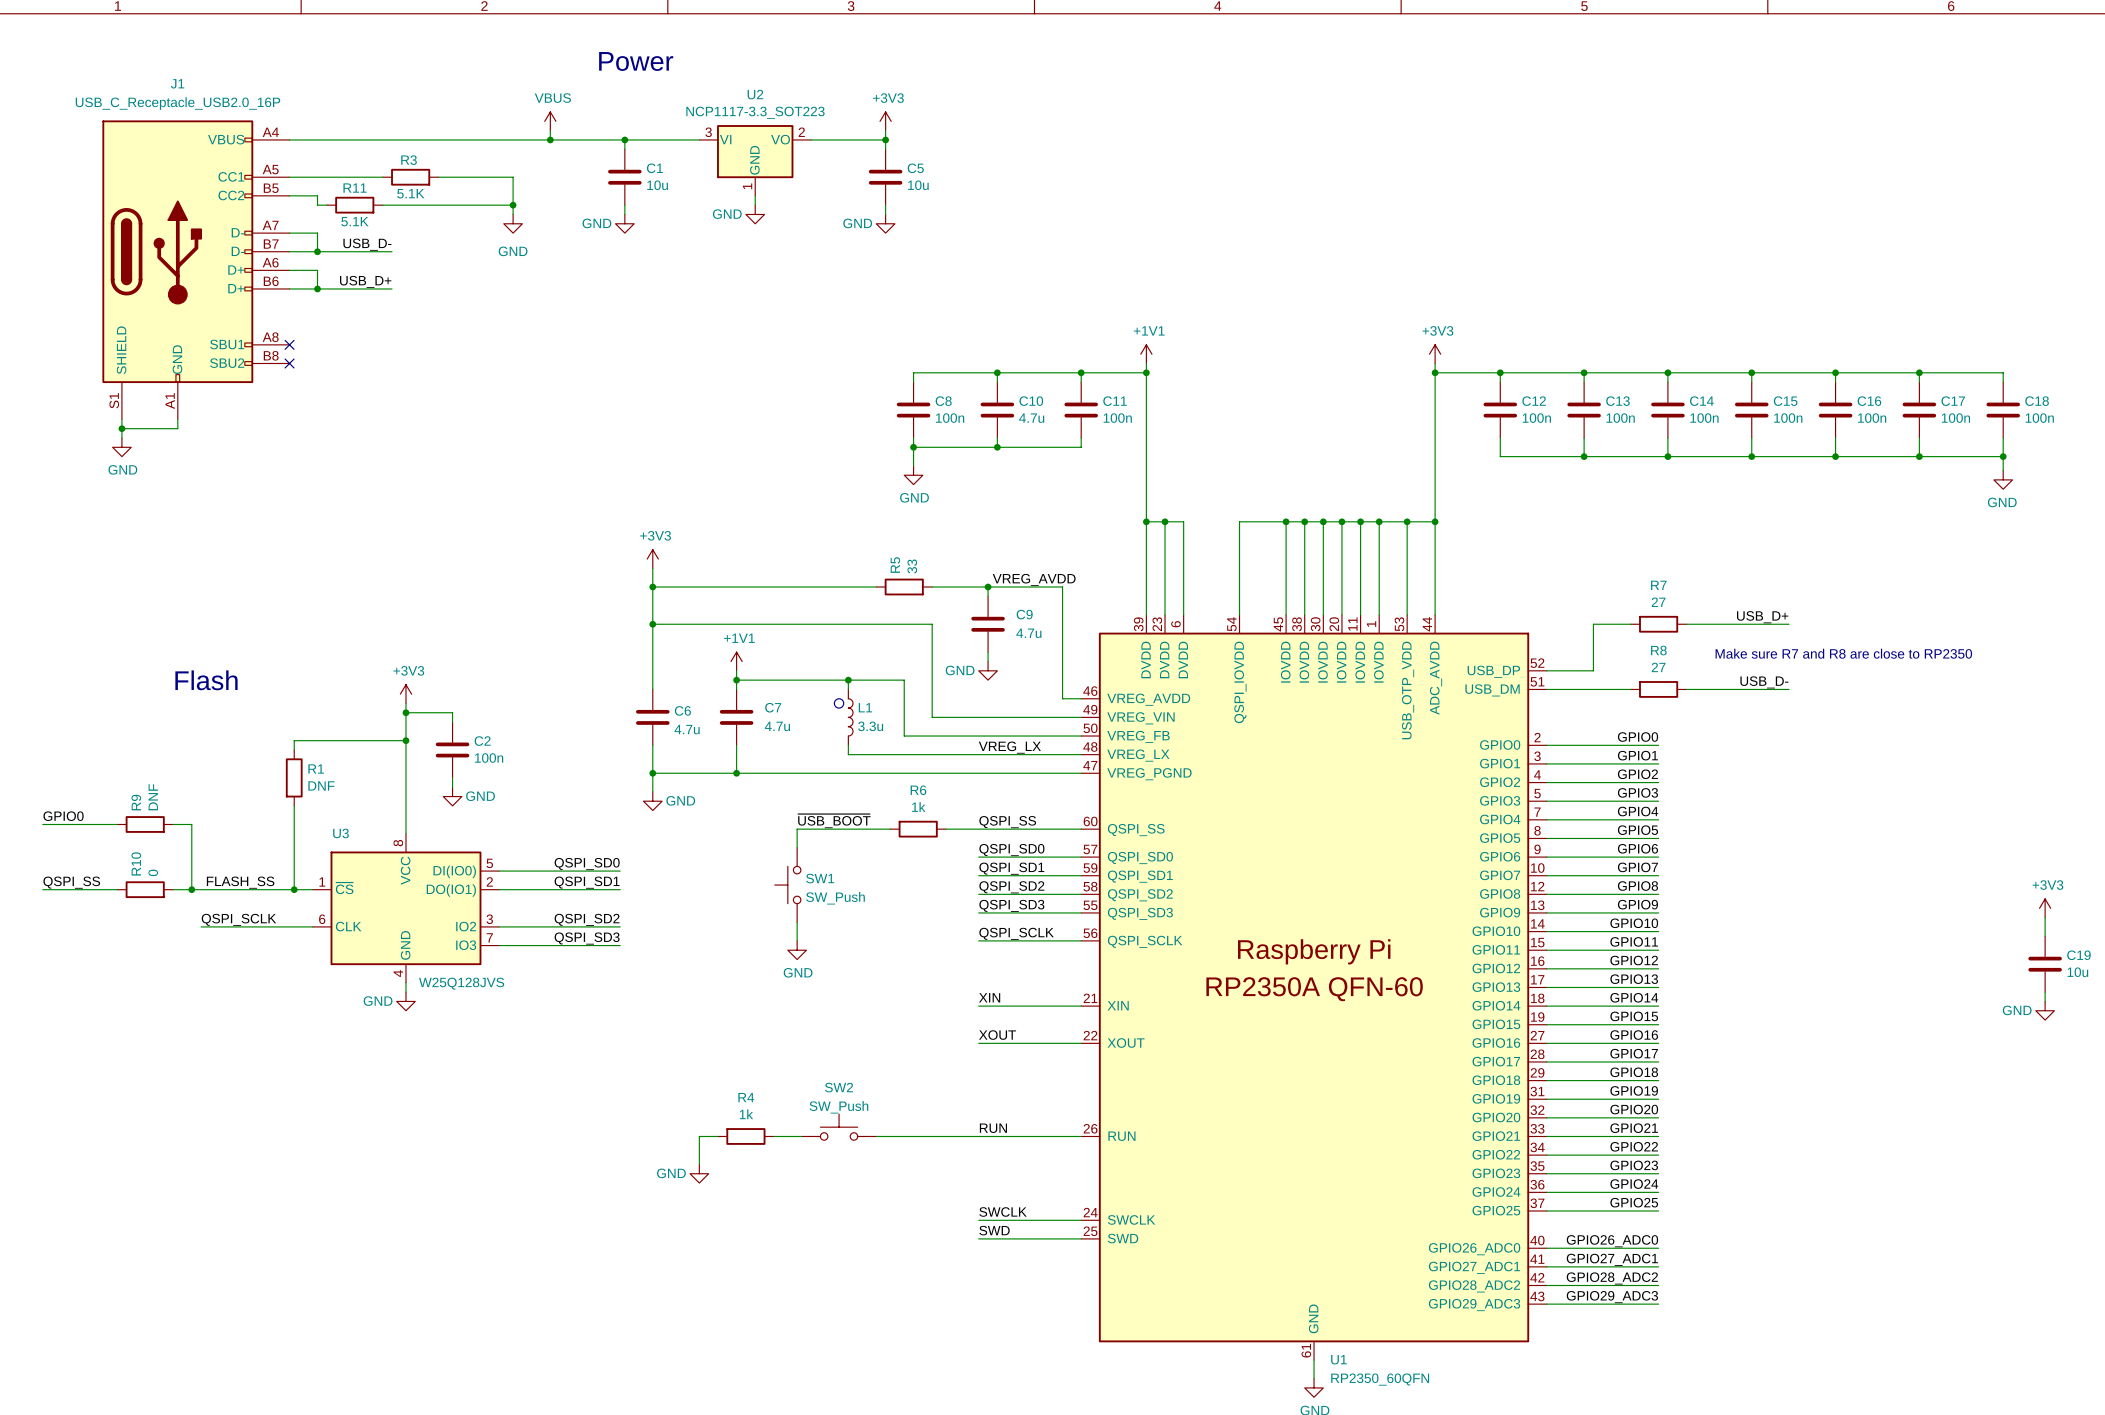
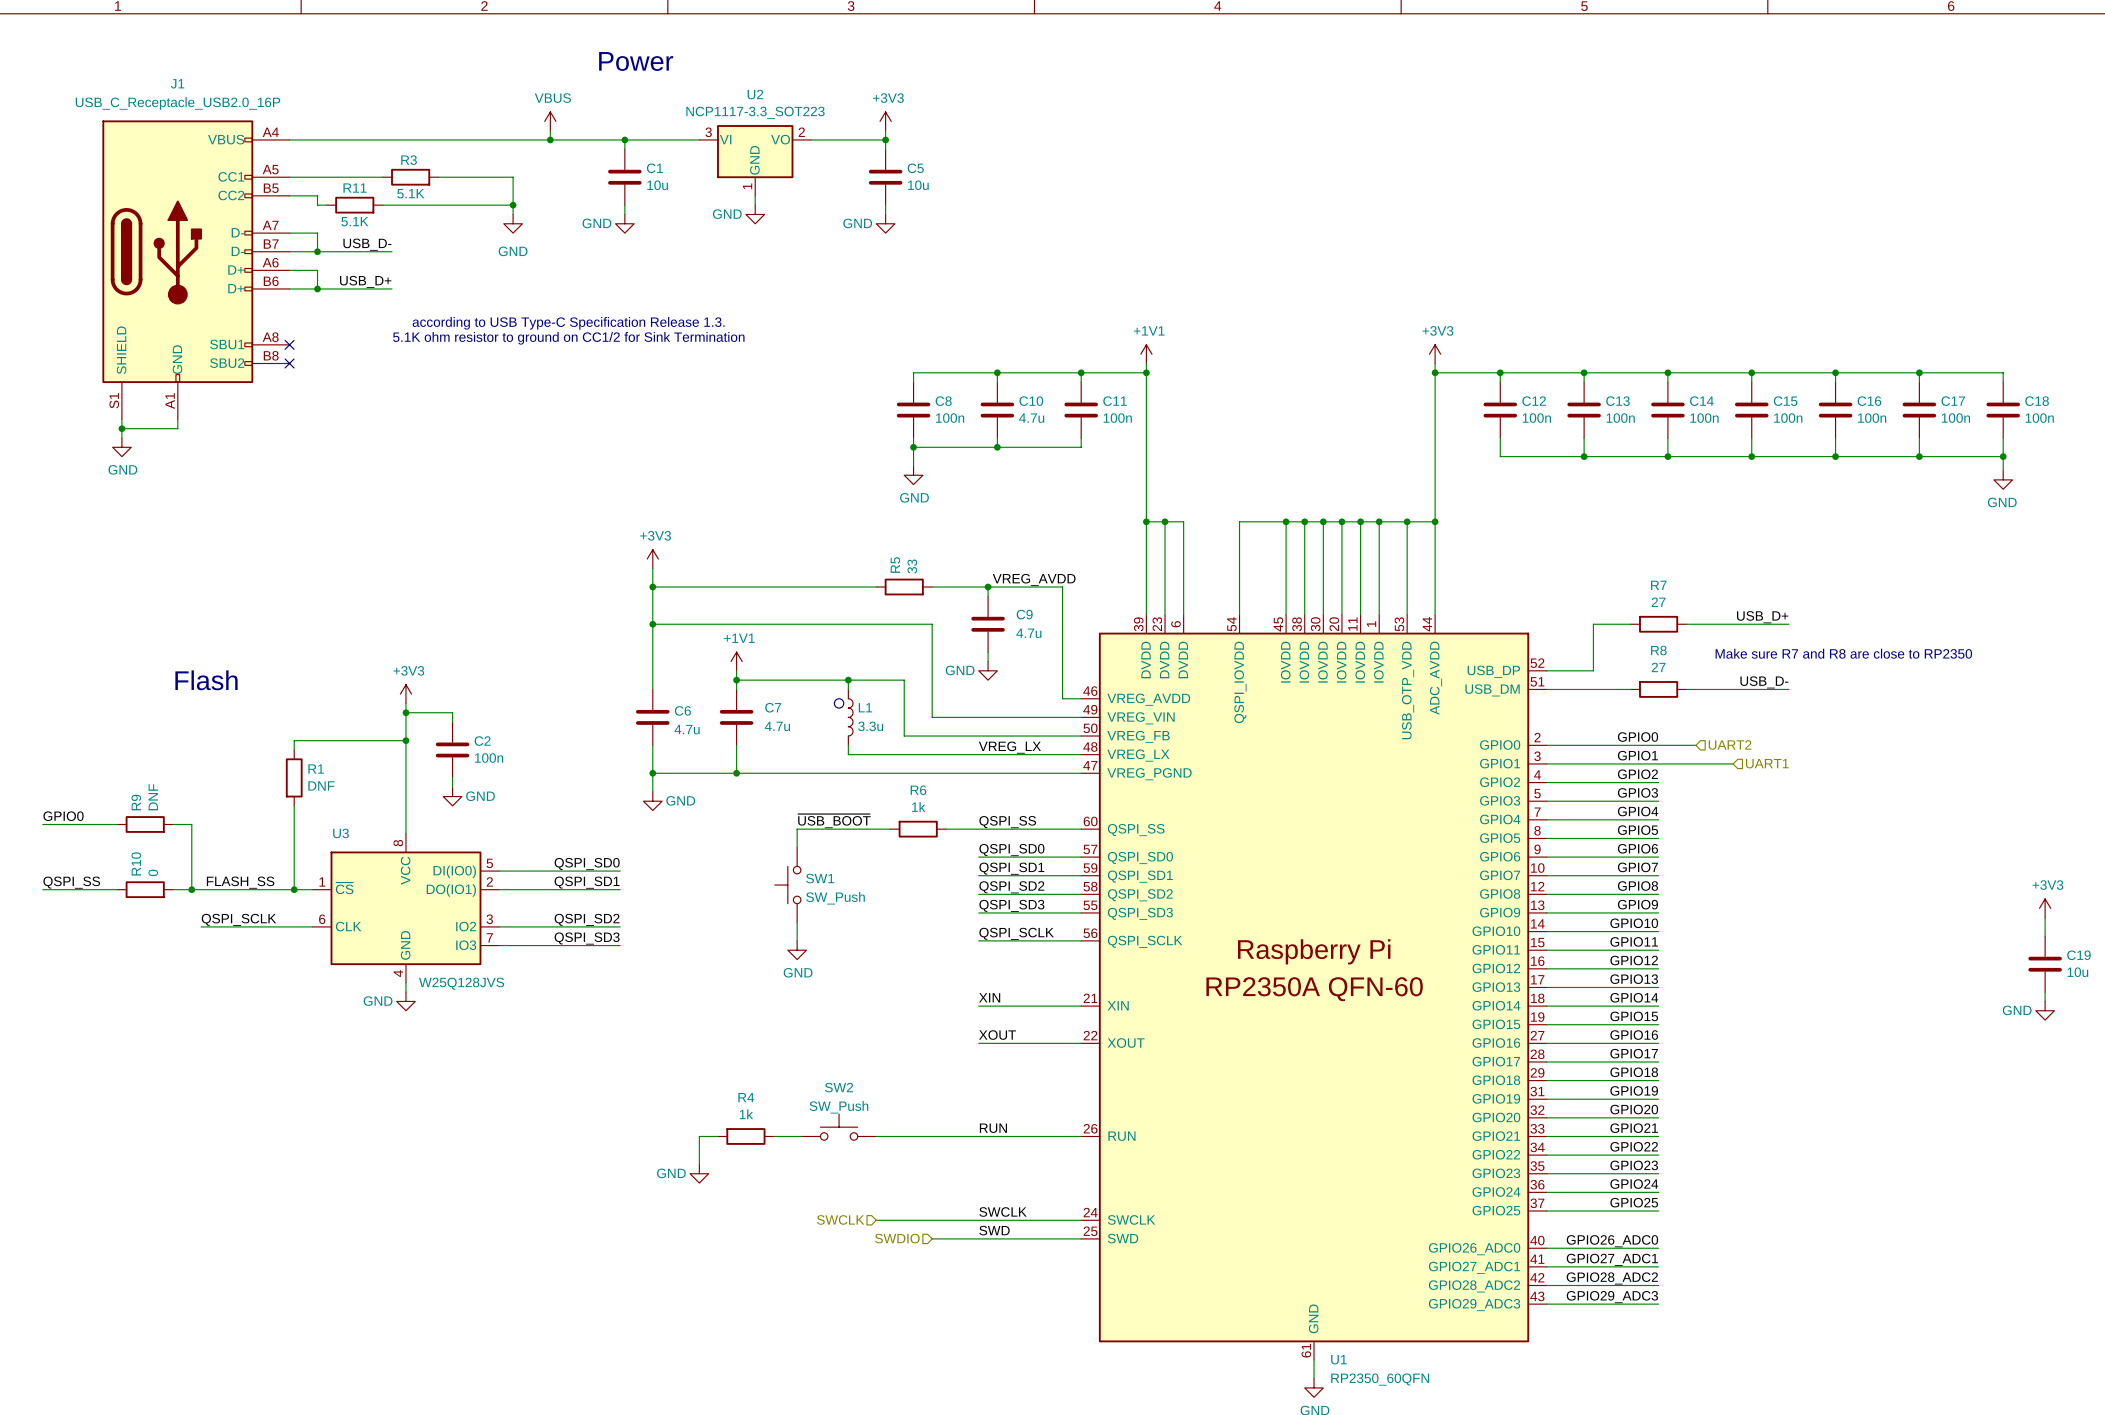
text: none -> according to USB Type-C Specification Release 1.3. (568, 323)
text: none -> 5.1K ohm resistor to ground on CC1/2 for Sink Termination (568, 338)
hierarchical label: none -> UART2 (1730, 744)
wire: none -> (1658, 745) (1695, 745)
wire: none -> (1658, 763) (1733, 763)
hierarchical label: none -> UART1 (1767, 763)
hierarchical label: none -> SWCLK (840, 1219)
wire: none -> (876, 1220) (978, 1220)
hierarchical label: none -> SWDIO (897, 1238)
wire: none -> (932, 1238) (978, 1238)

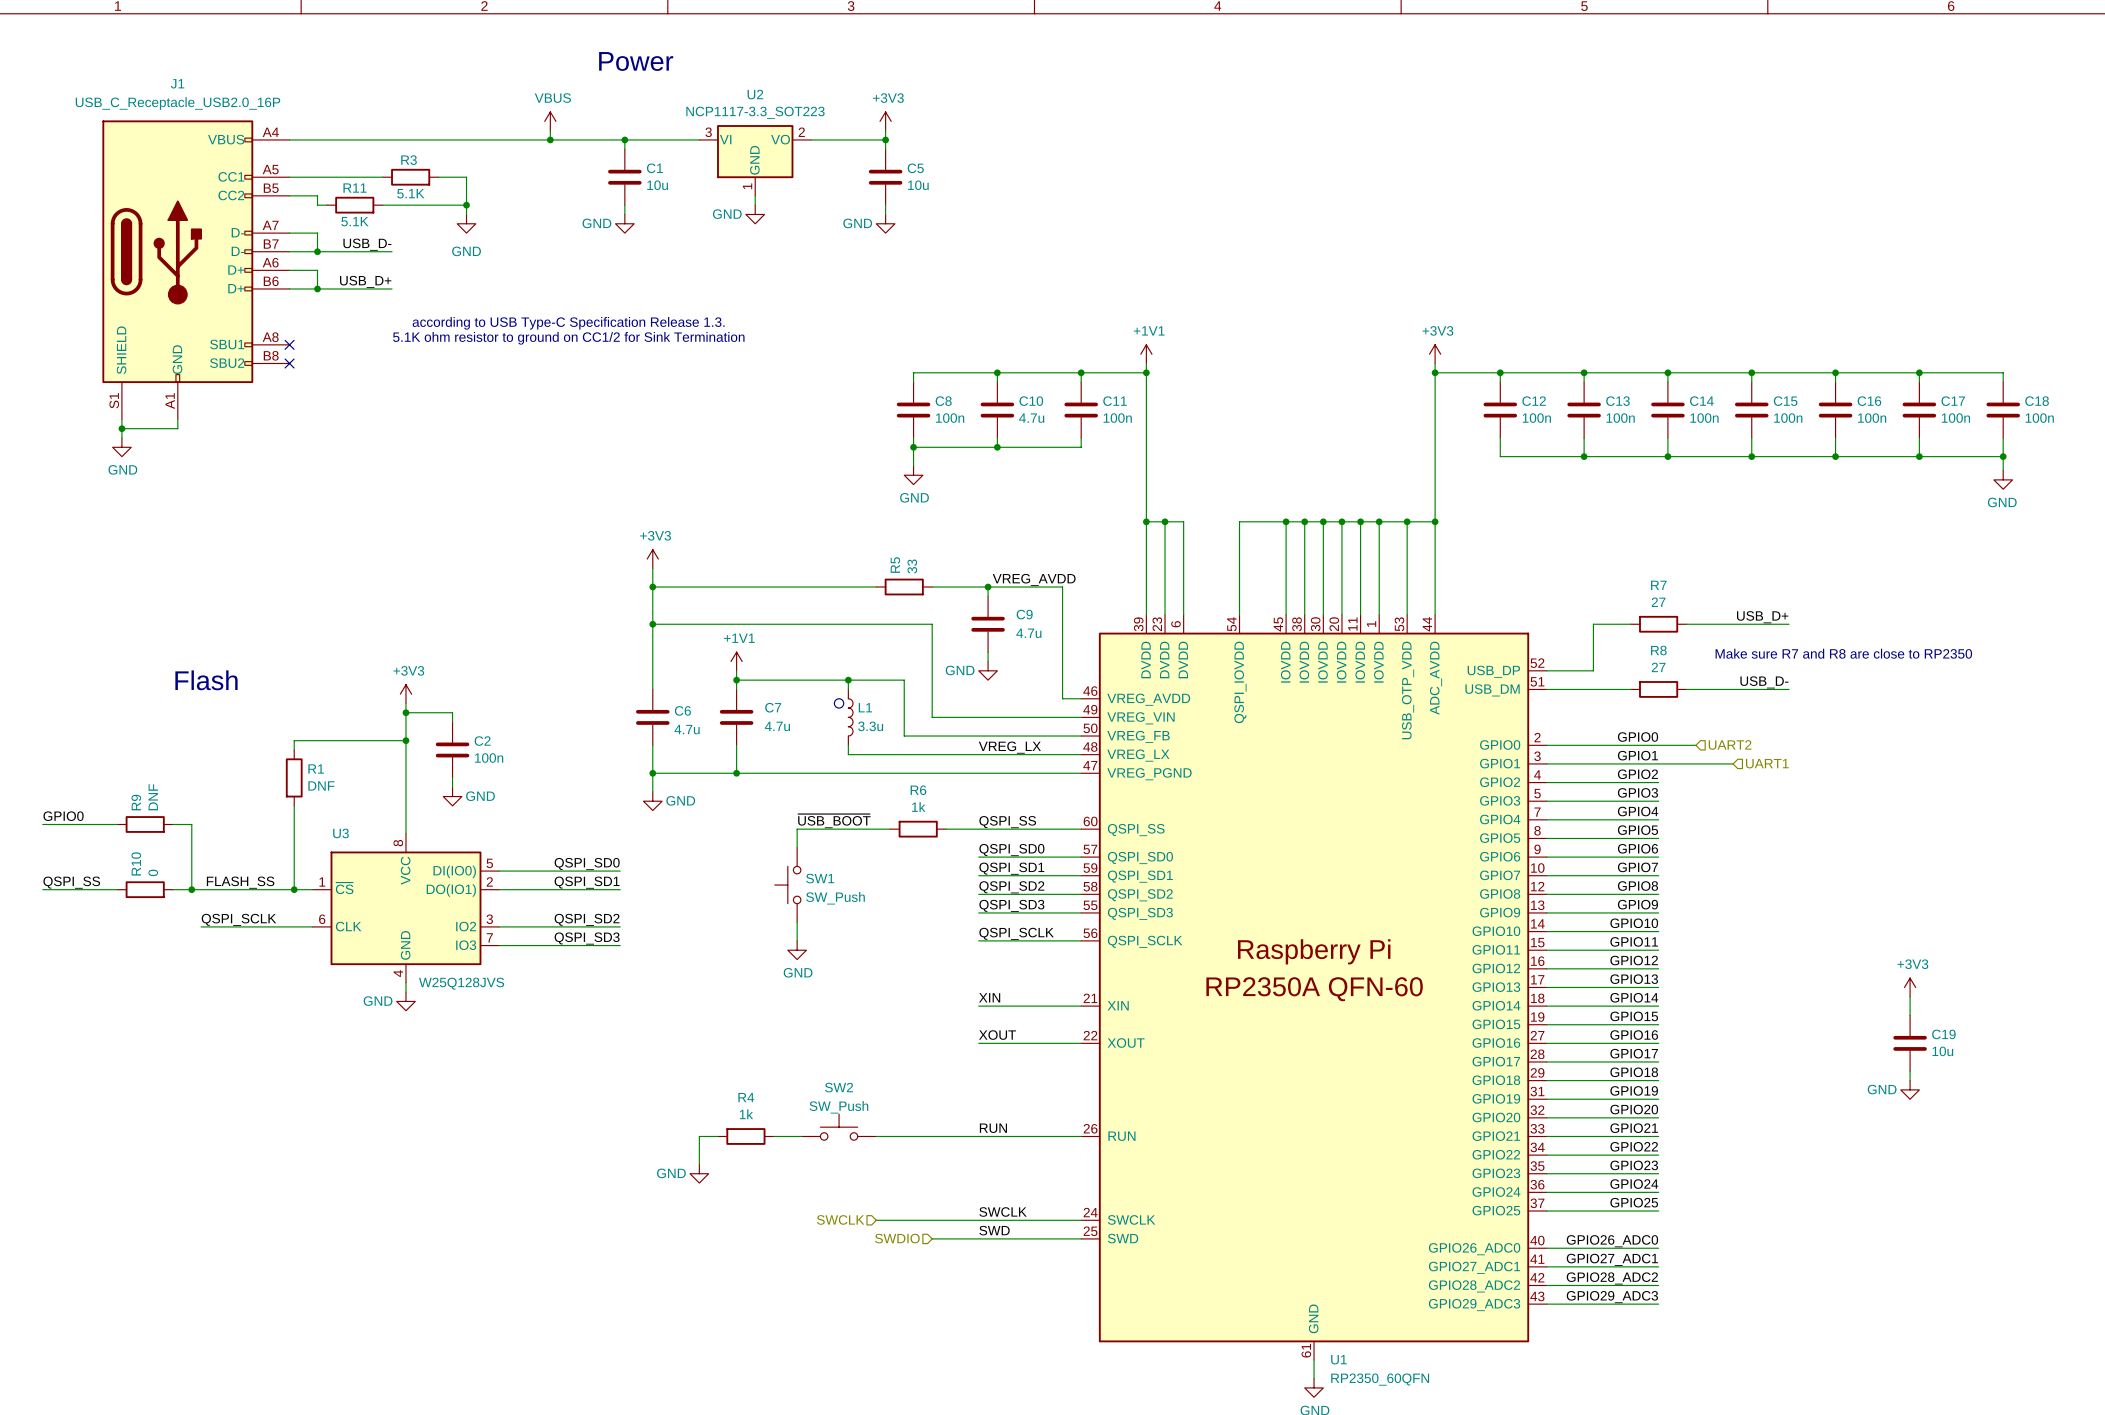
wire: (466, 177) (513, 177) (513, 214) -> (466, 177) (466, 214)
wire: (466, 205) (513, 205) -> none
junction: none -> (466, 205)
junction: (513, 205) -> none
power symbol position: GND (513, 223) -> GND (466, 223)
power symbol position: +3V3 (2045, 908) -> +3V3 (1910, 987)
wire: (2045, 917) (2045, 936) -> (1910, 996) (1910, 1015)
C19 position: (2045, 964) -> (1910, 1043)
wire: (2045, 992) (2045, 1001) -> (1910, 1071) (1910, 1080)
power symbol position: GND (2045, 1010) -> GND (1910, 1089)

